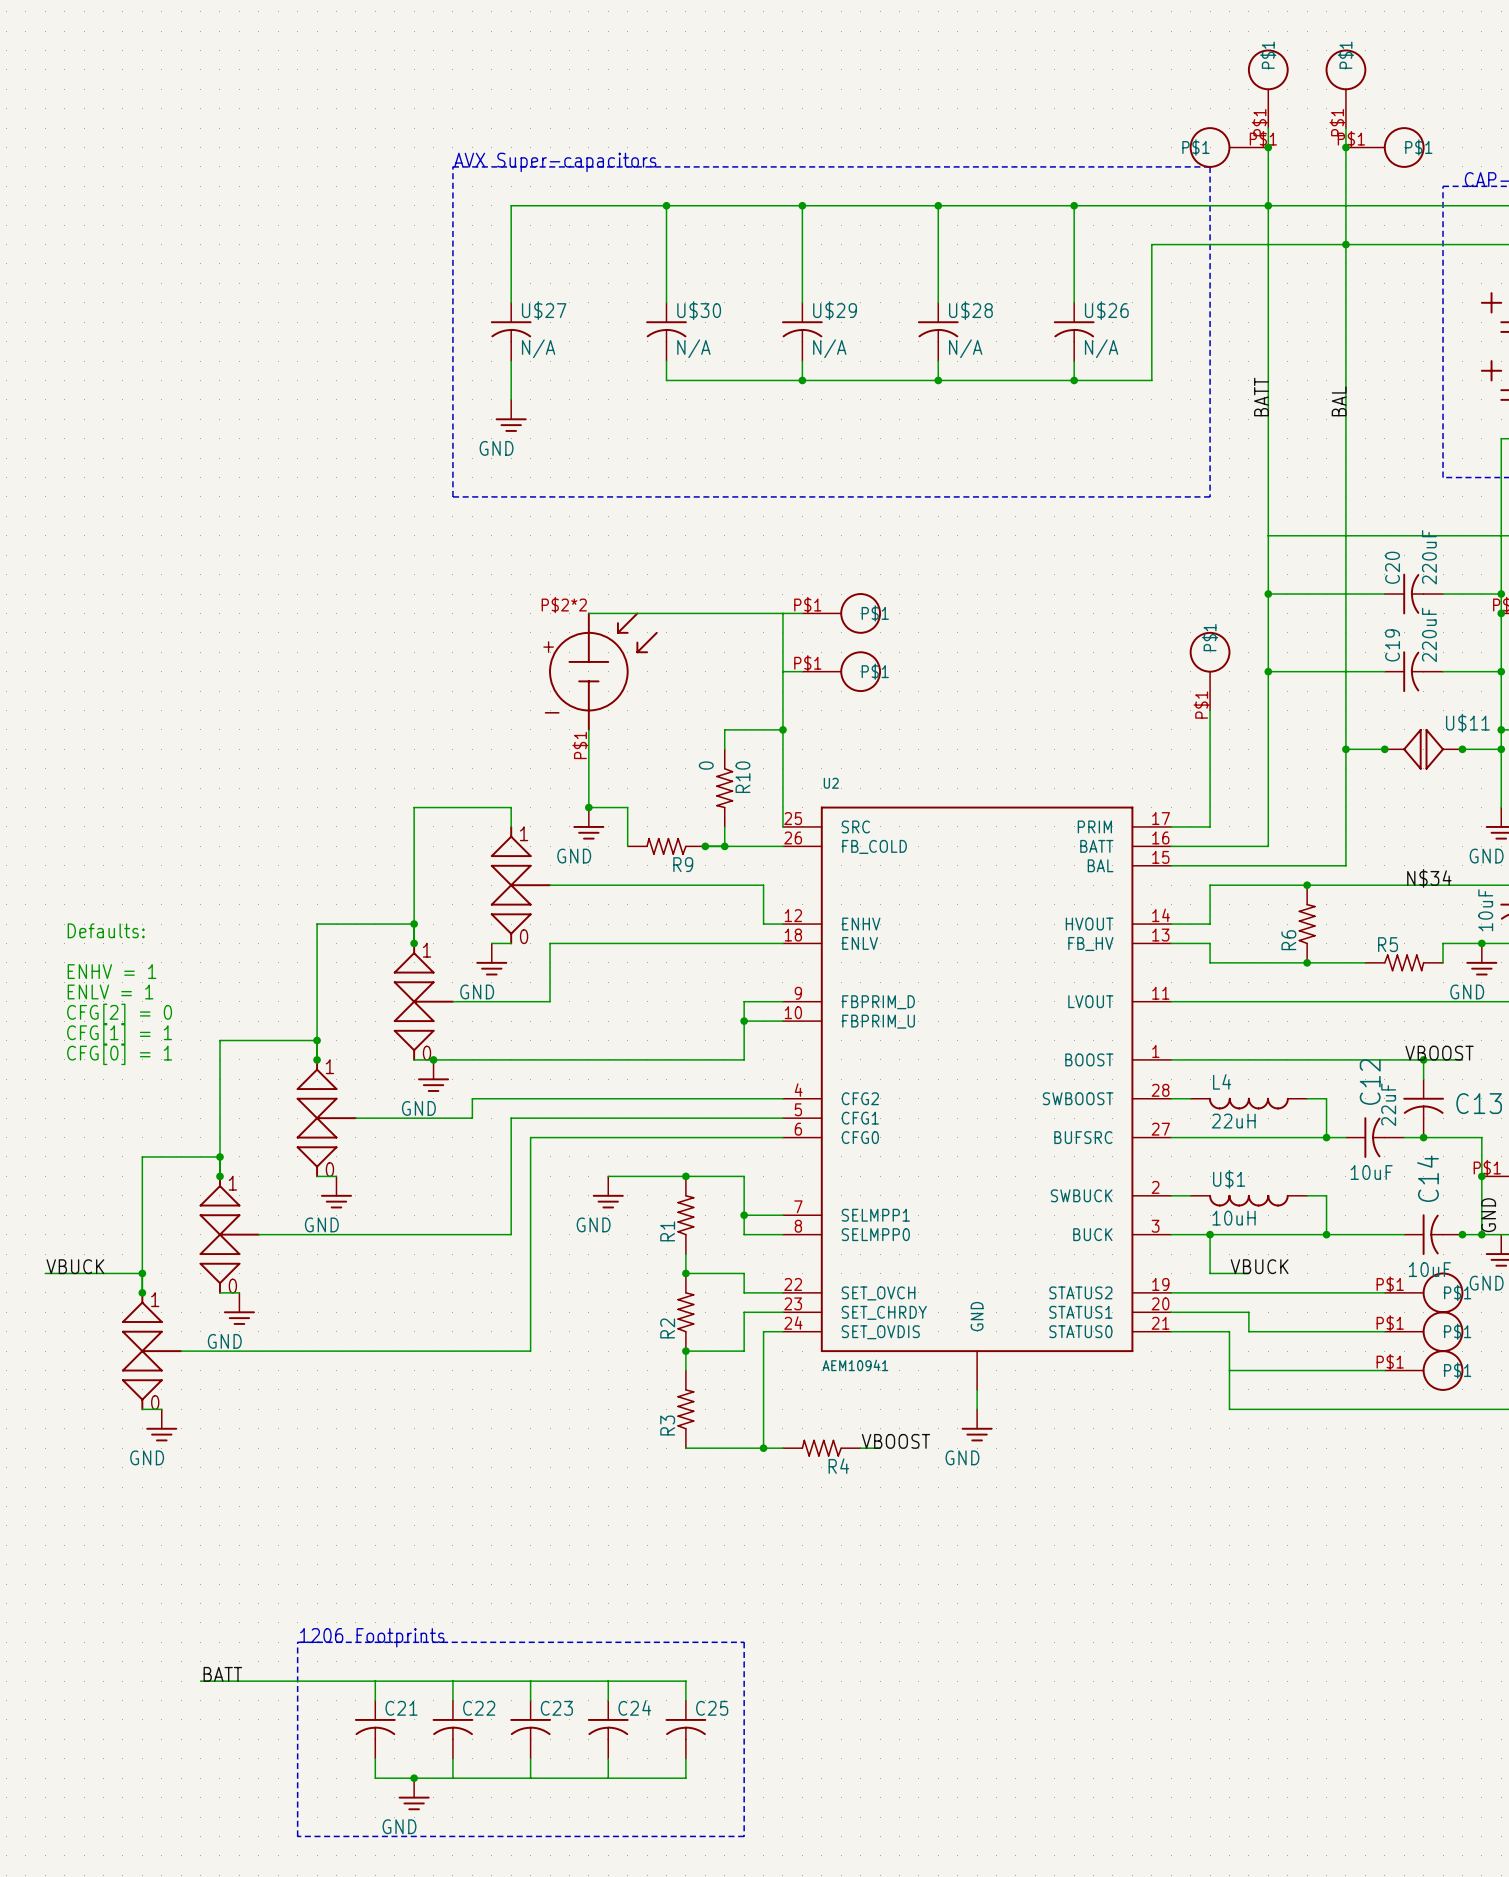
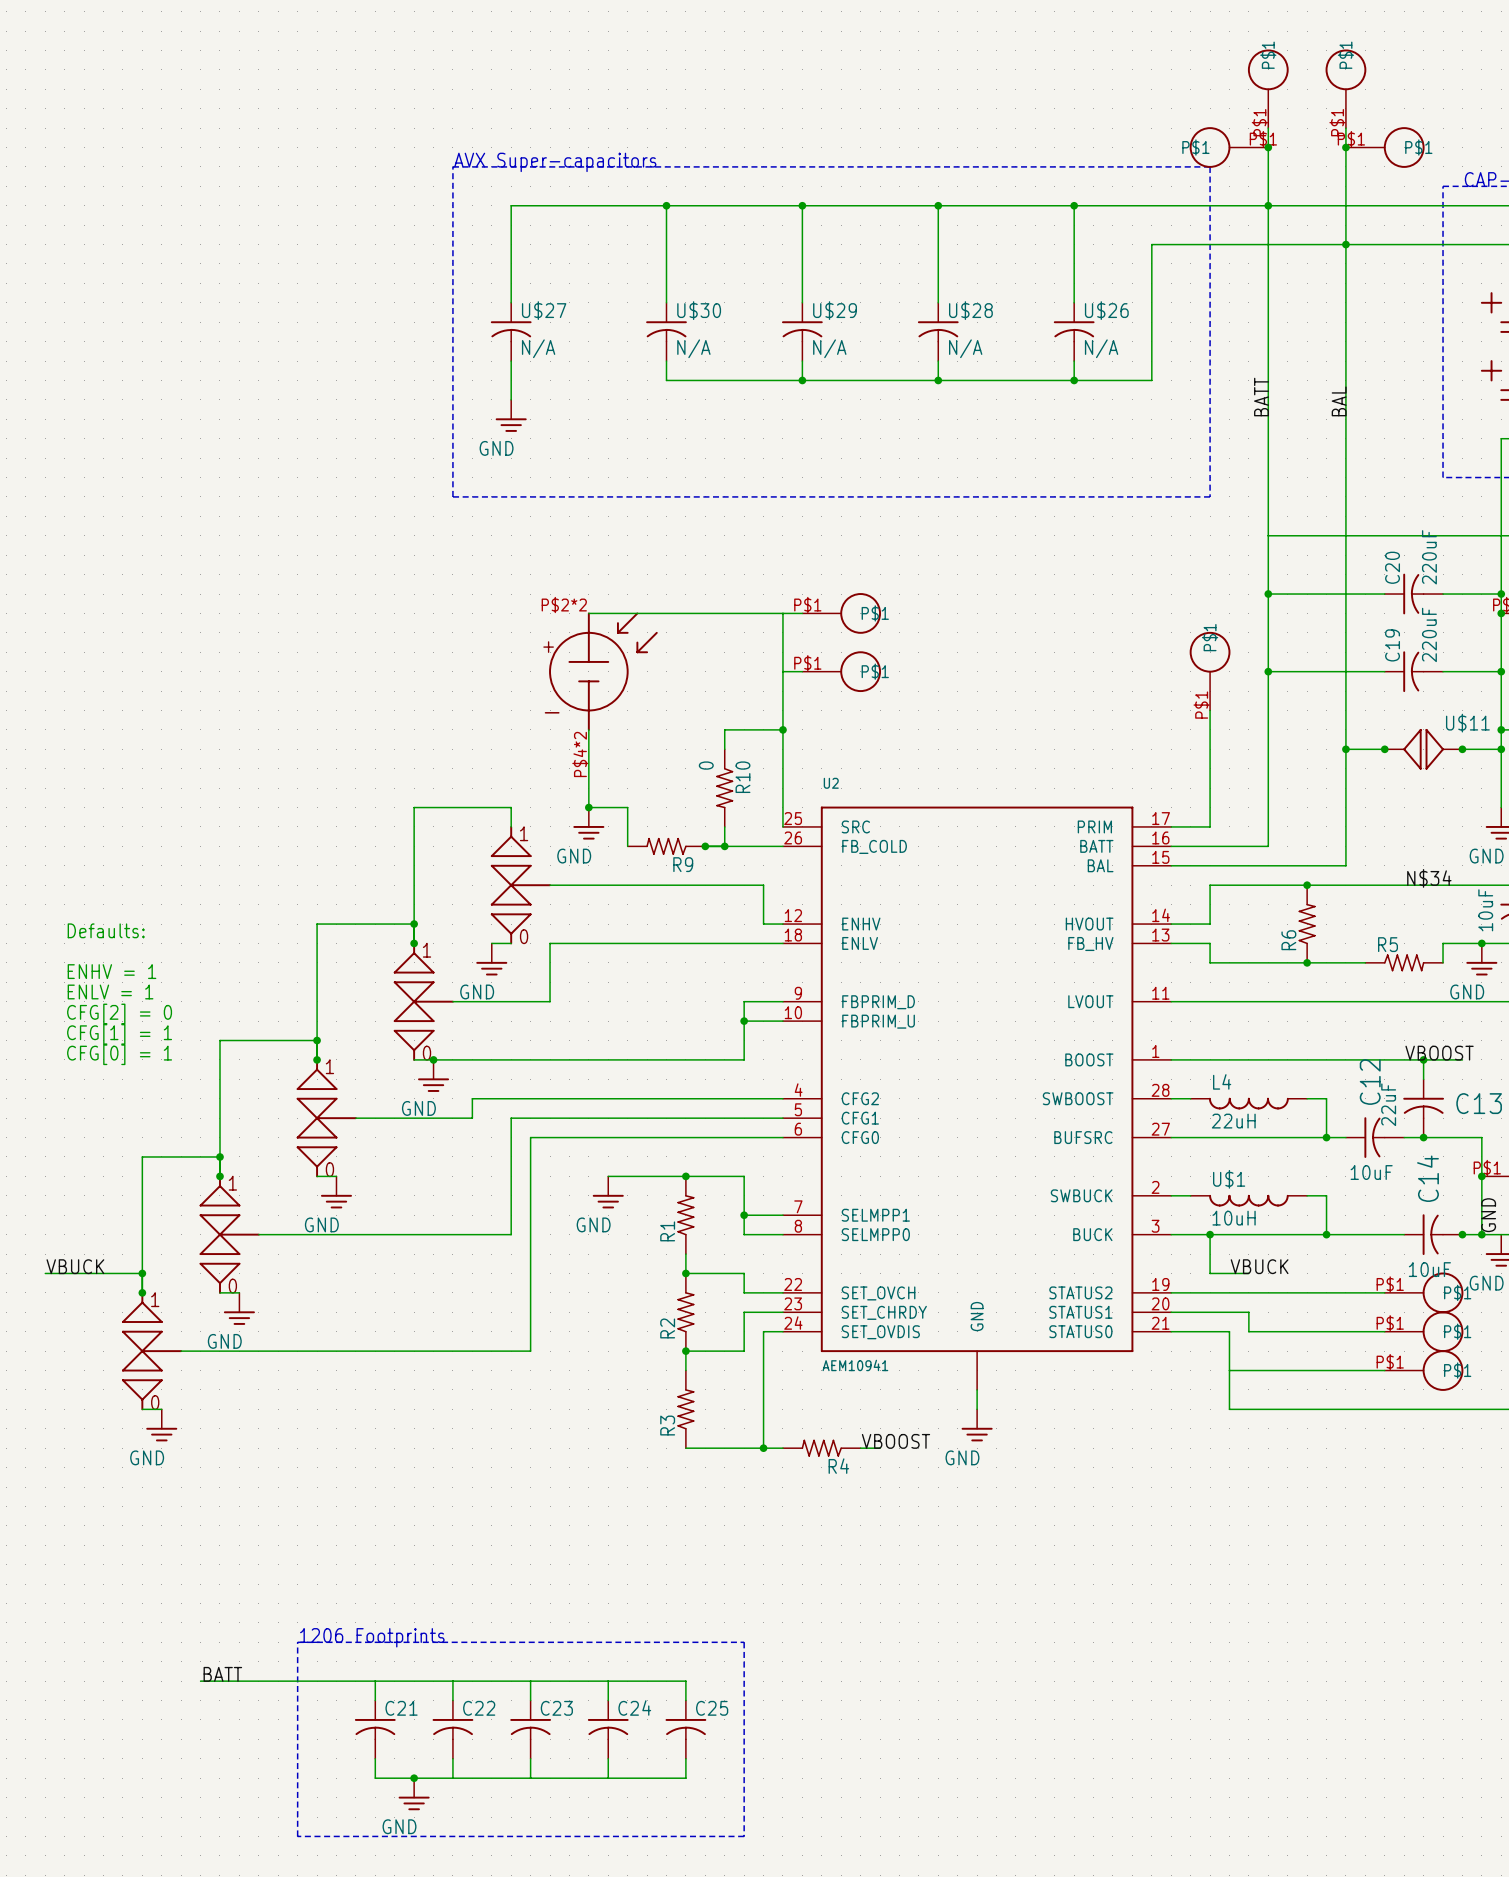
part pin number: P$1 (580, 745) -> P$4*2 (580, 754)

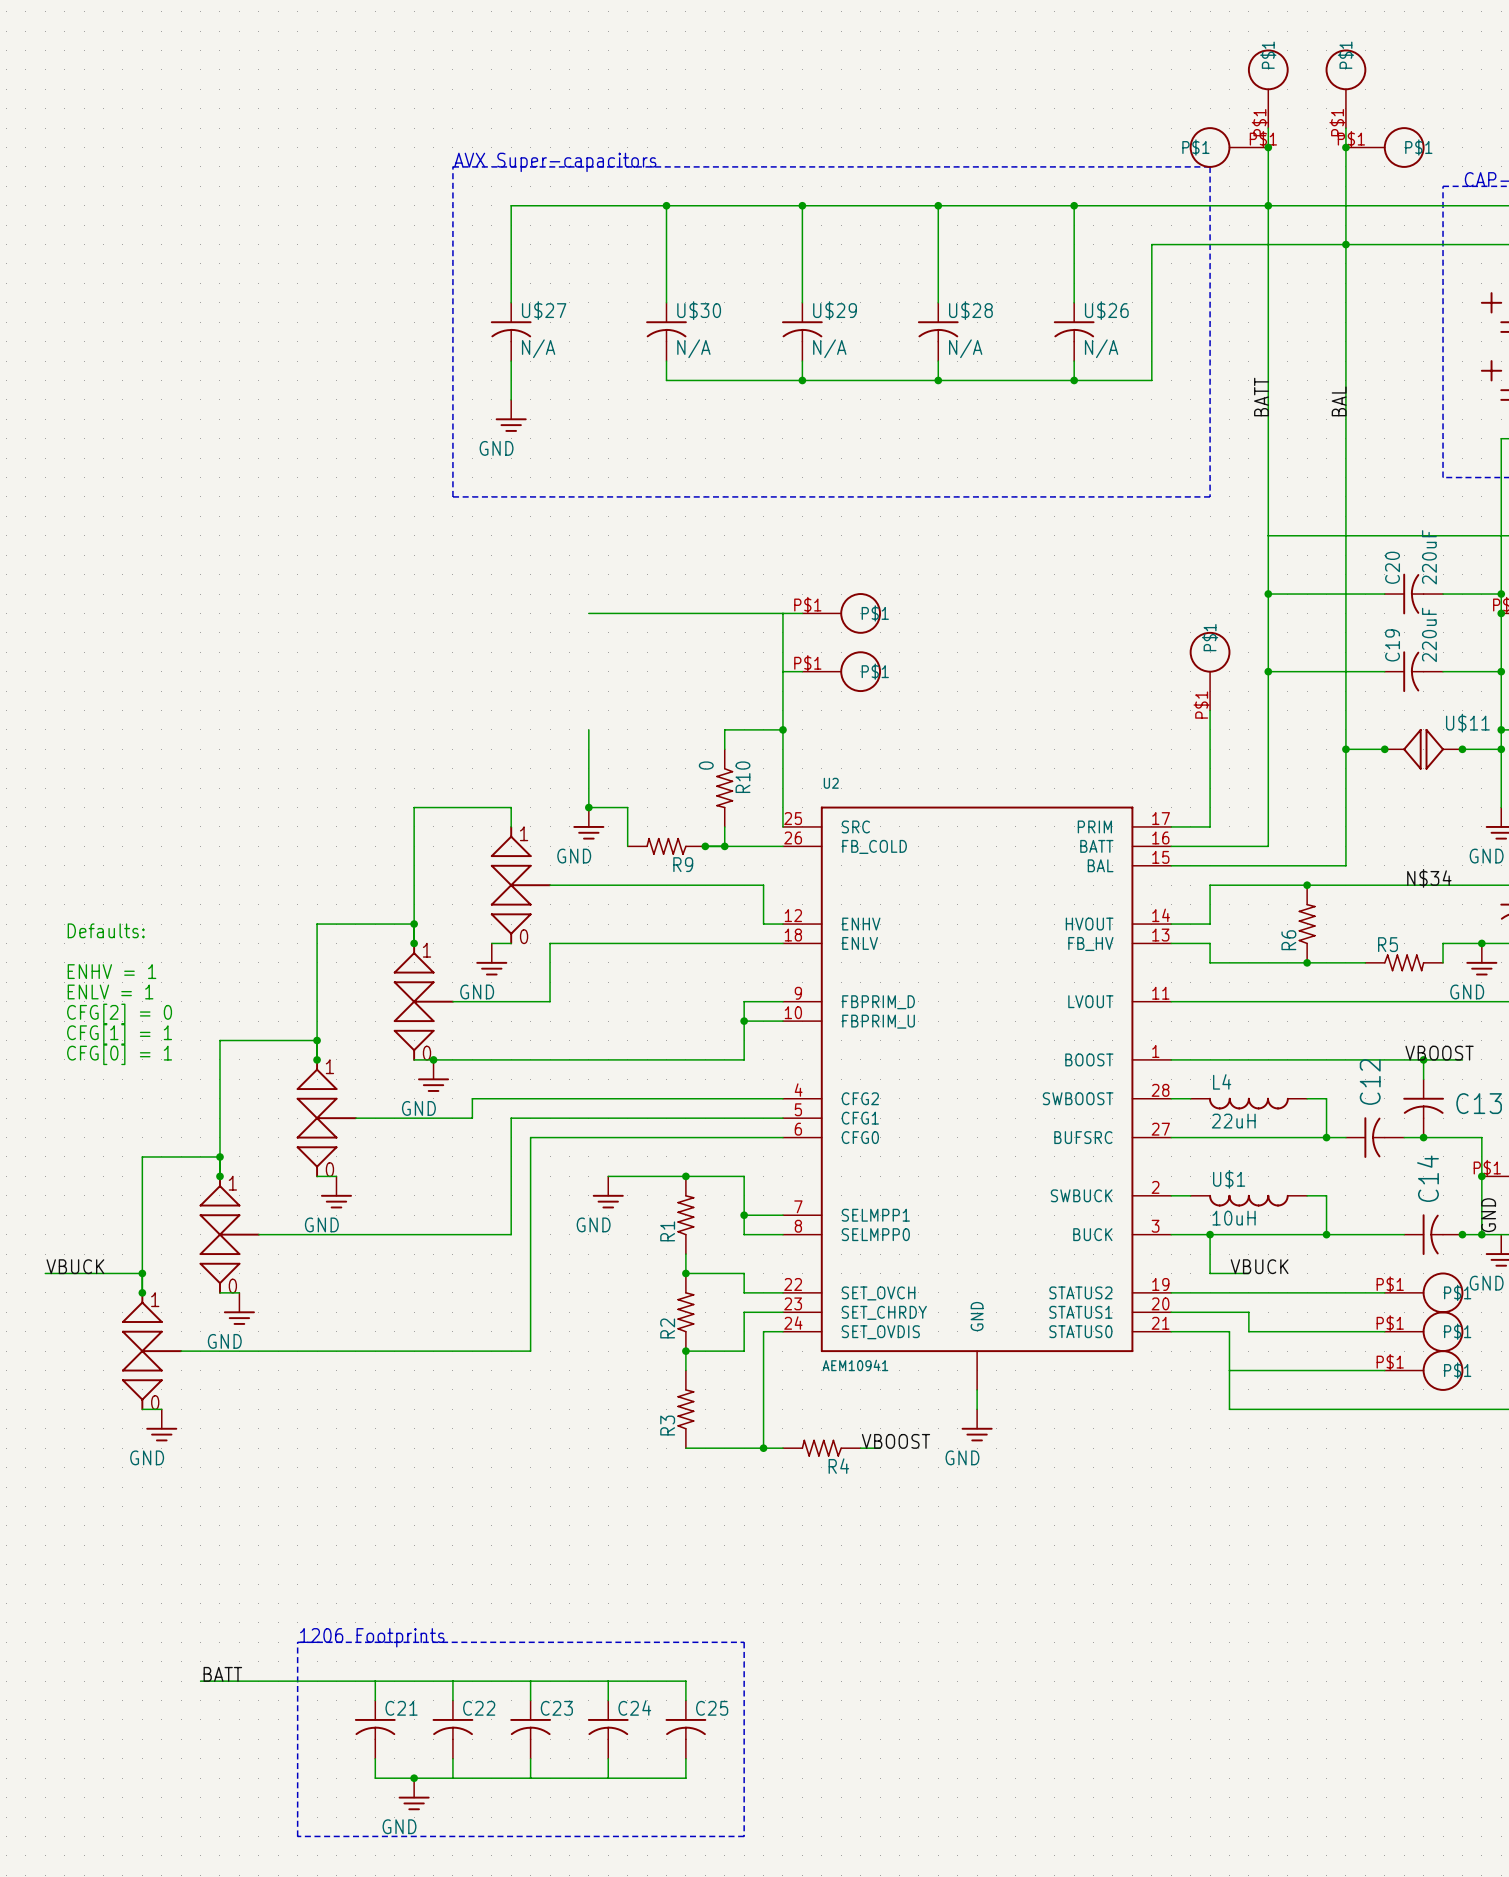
part: (603, 671) -> none
part value: 10uF (1485, 910) -> none
C13 value: 22uF (1388, 1104) -> none
C12 value: 10uF (1371, 1172) -> none
C14 value: 10uF (1429, 1269) -> none

